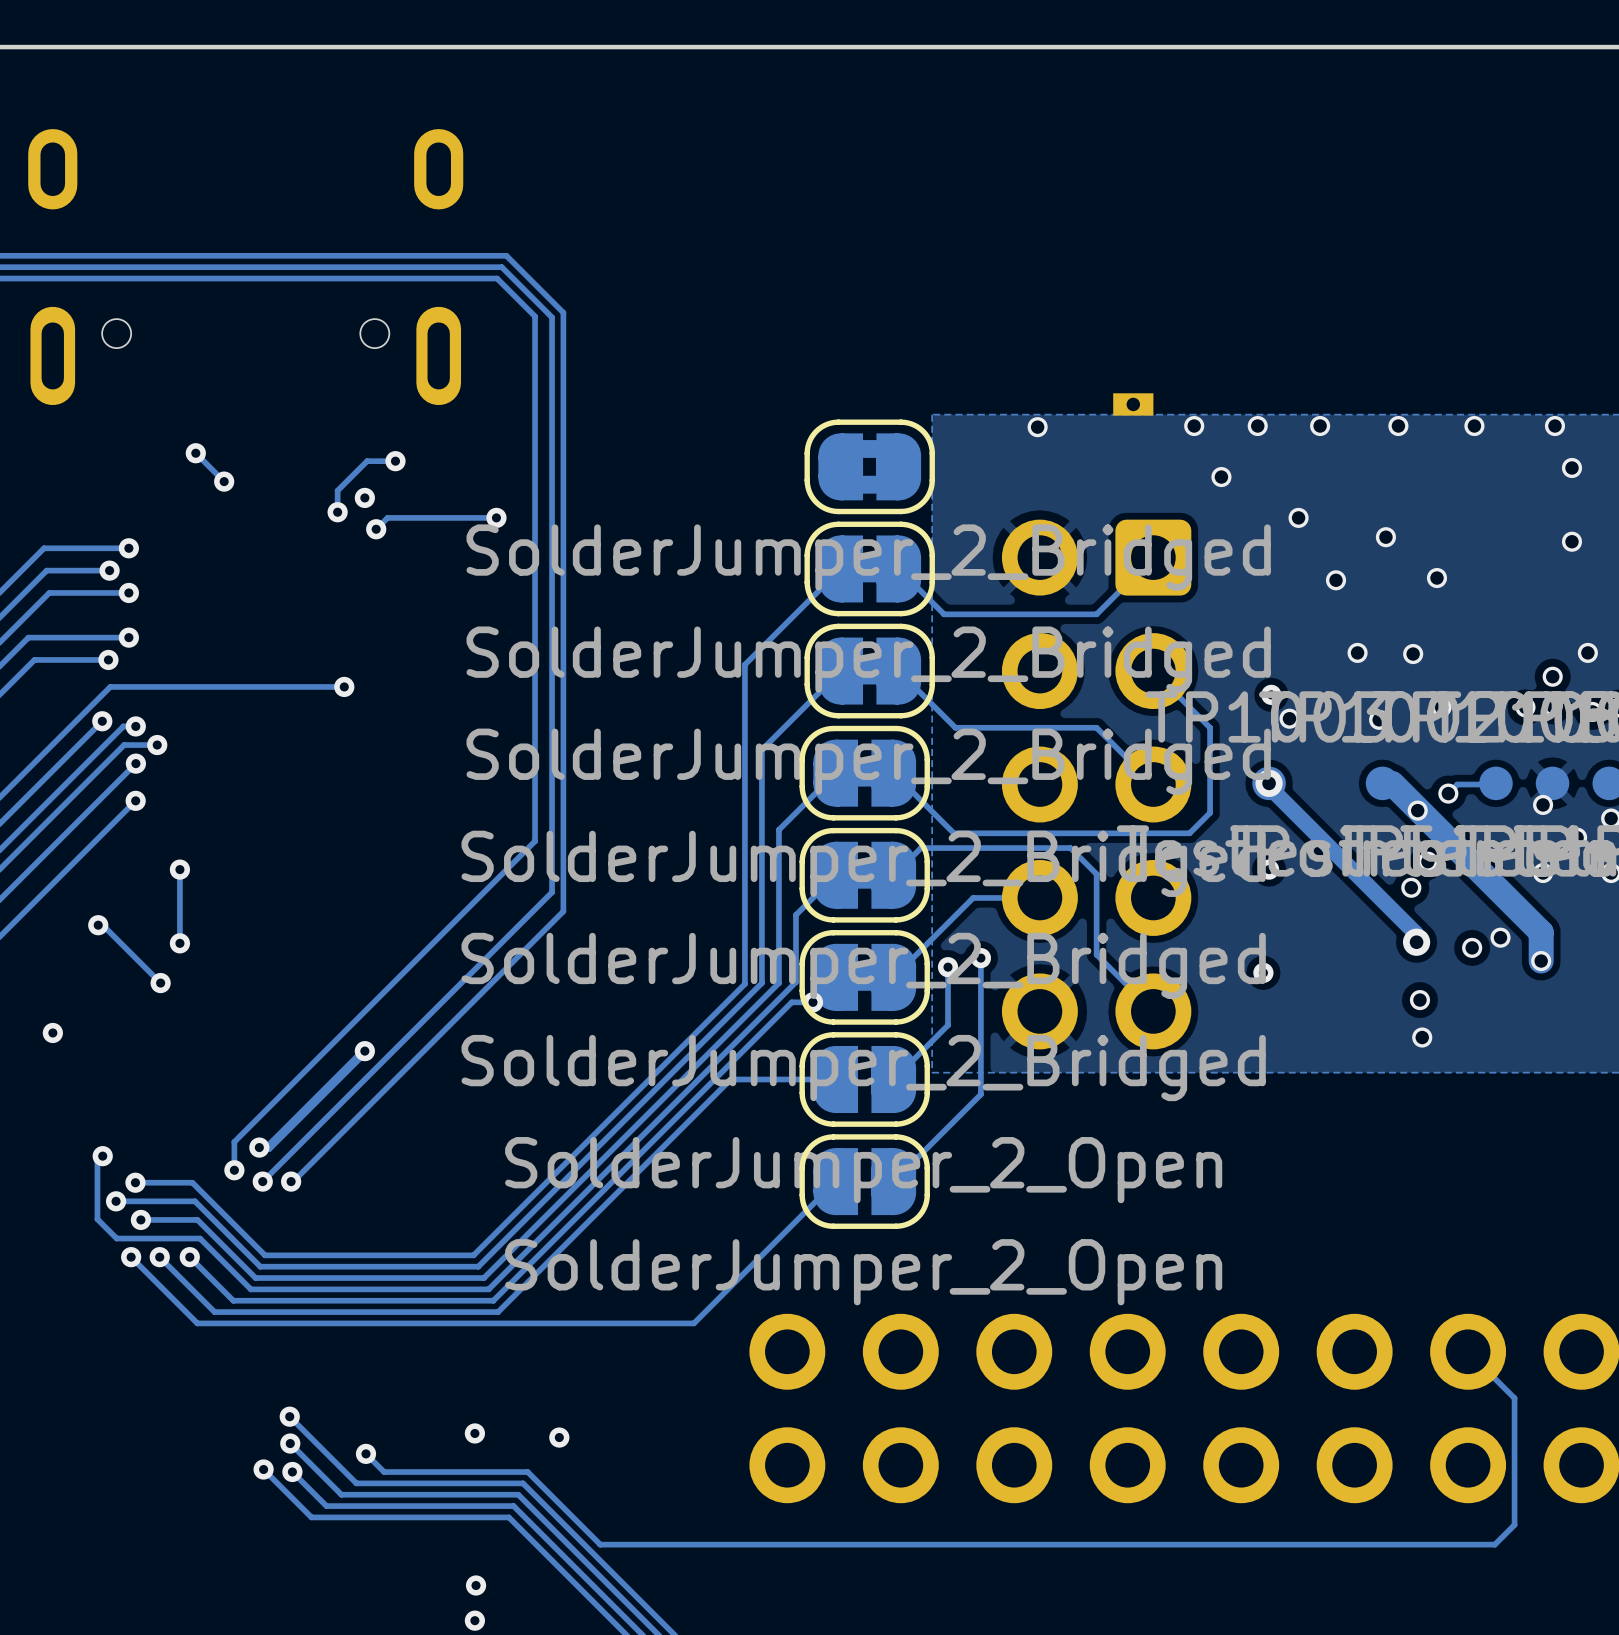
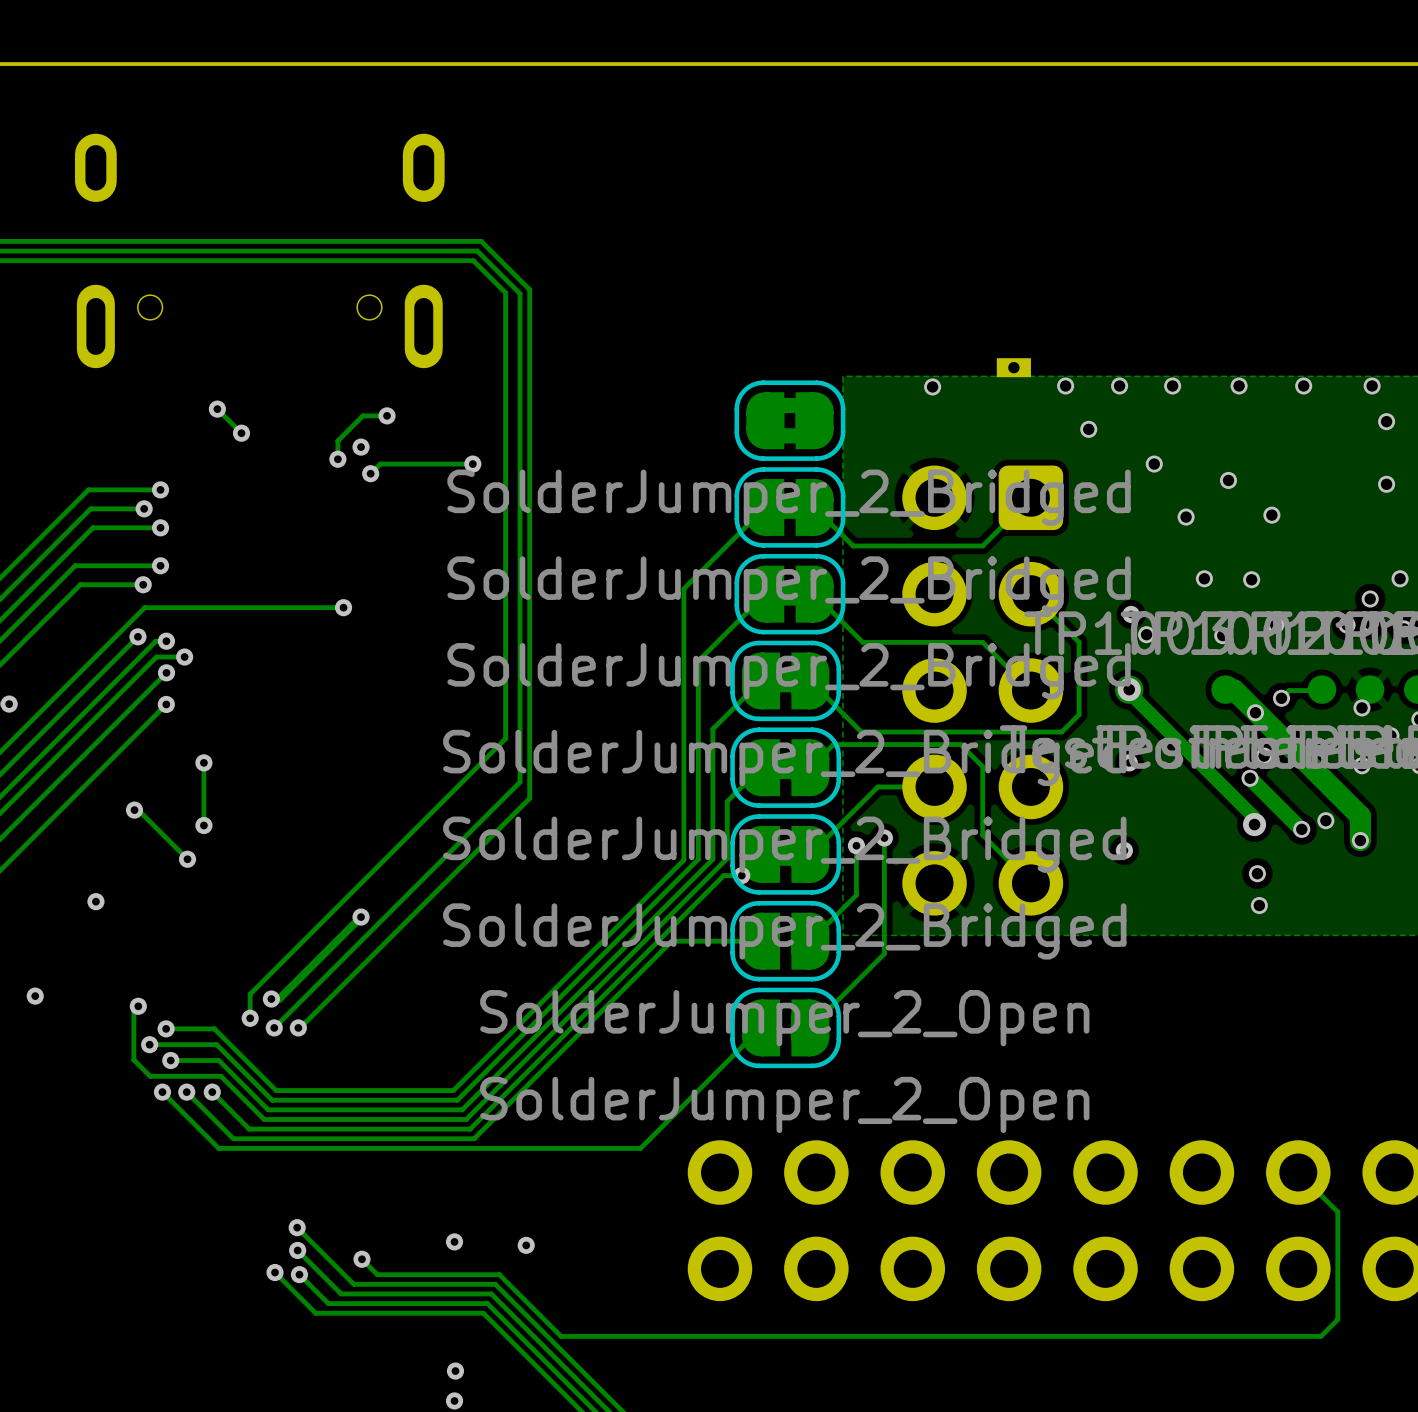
track: none -> (1250, 778) (1301, 829)

